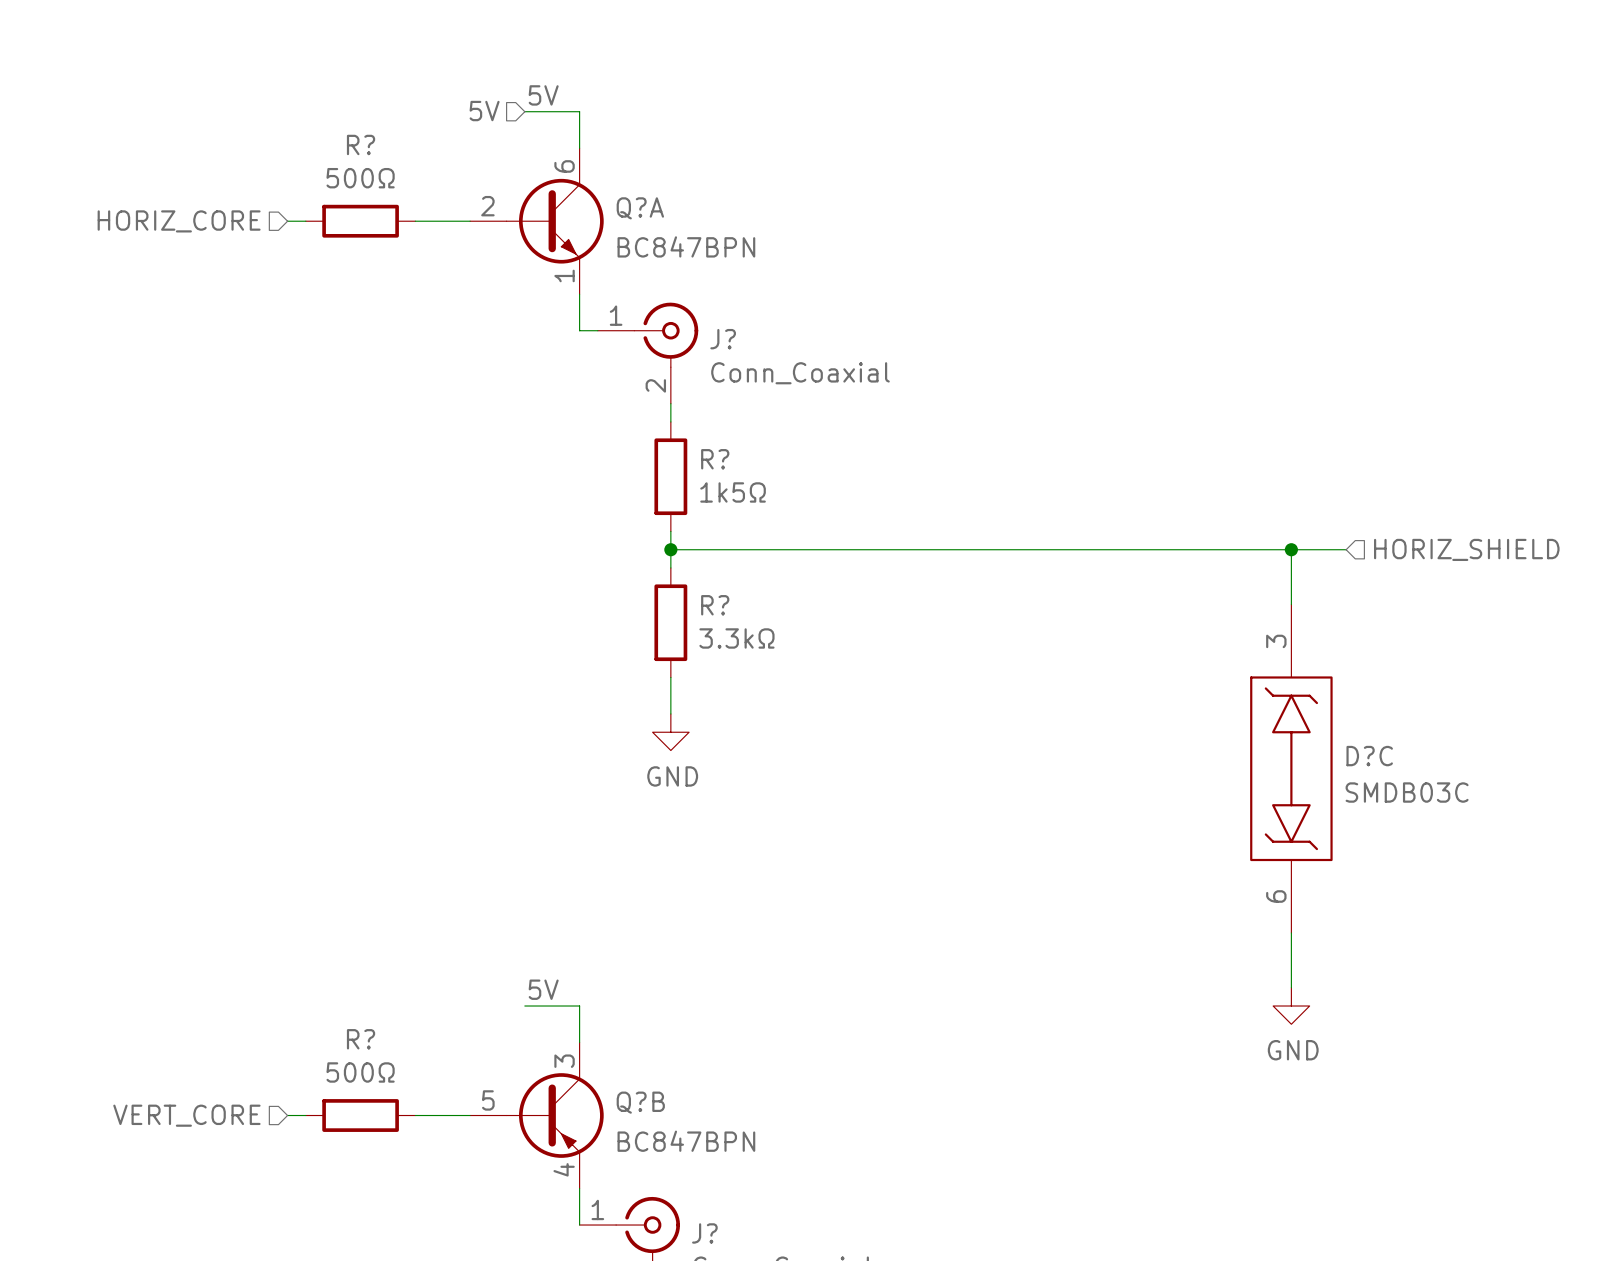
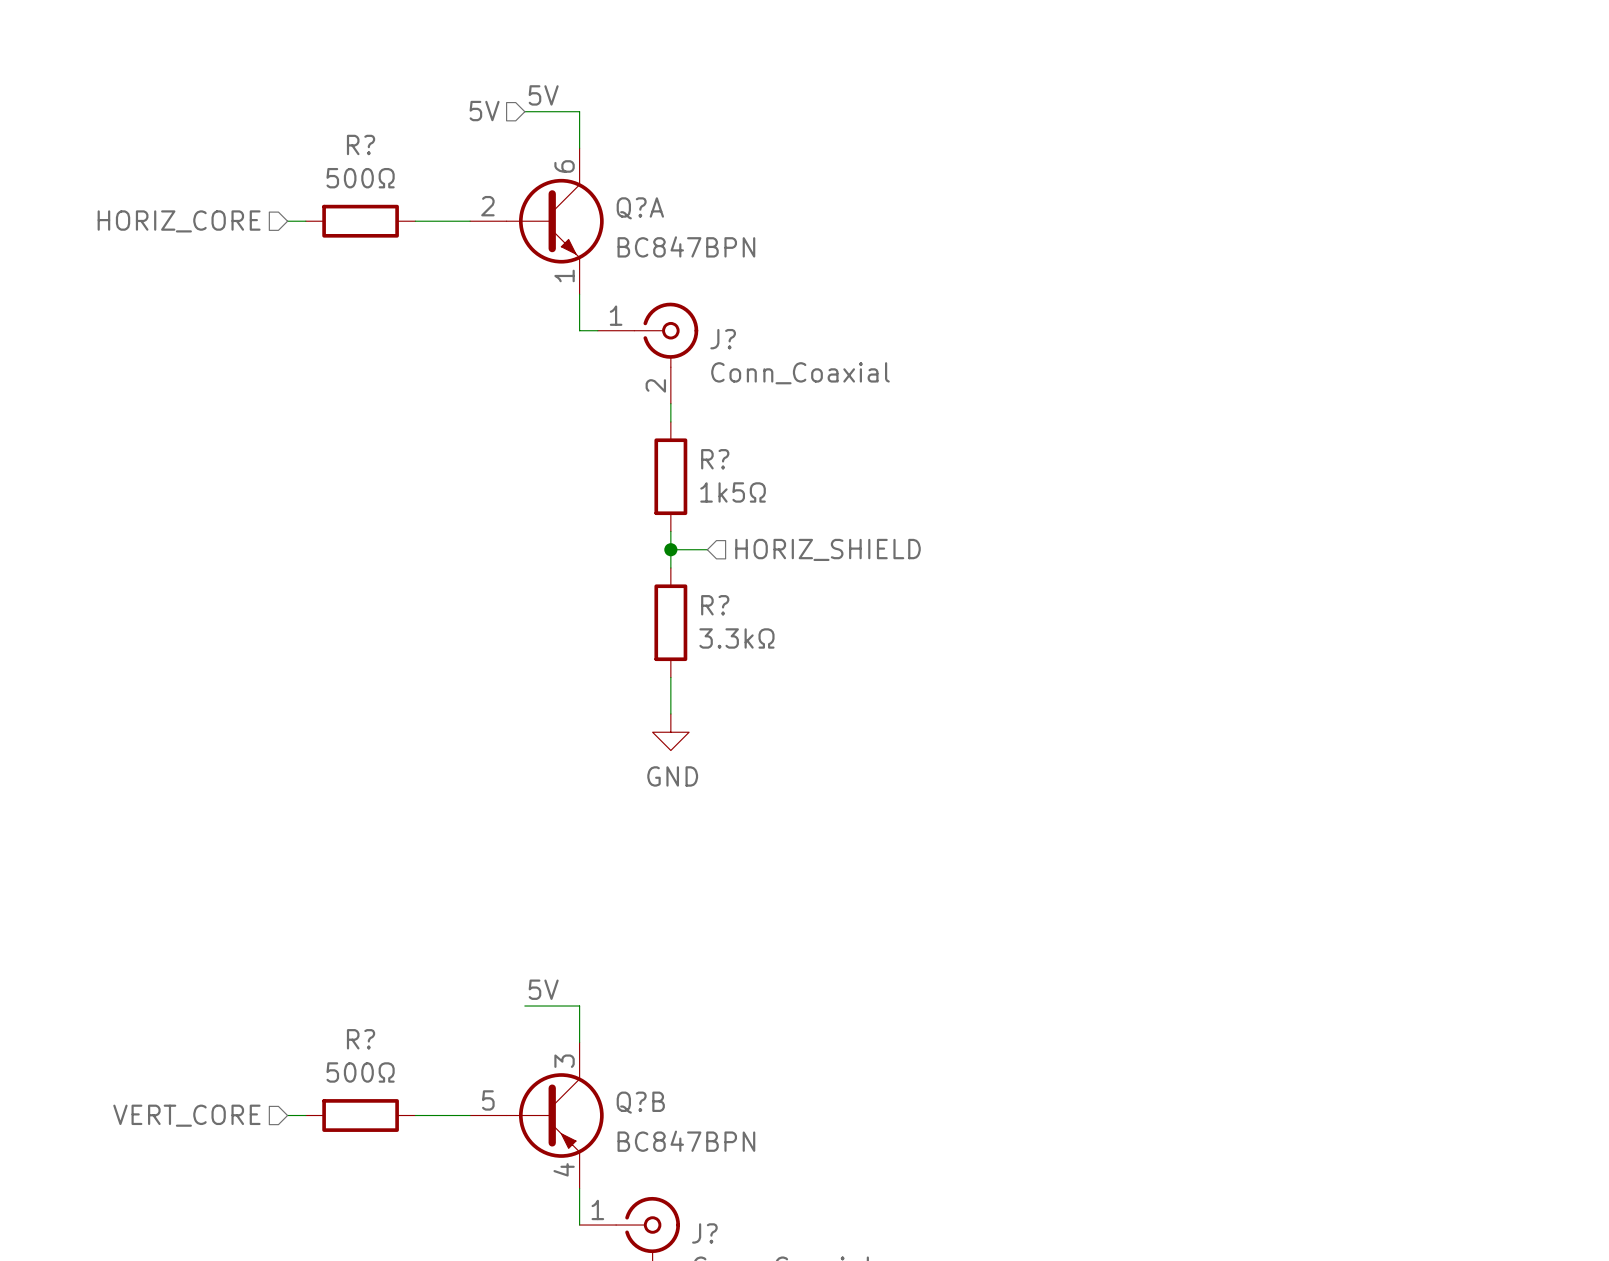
wire: (707, 549) (1346, 549) -> none
hierarchical label: none -> HORIZ_SHIELD (828, 549)
wire: (1291, 549) (1291, 604) -> none
junction: (1291, 549) -> none
hierarchical label: HORIZ_SHIELD (1466, 549) -> none
D?C: SMDB03C (1291, 768) -> none
wire: (1291, 933) (1291, 987) -> none
power symbol: GND (1291, 1006) -> none

